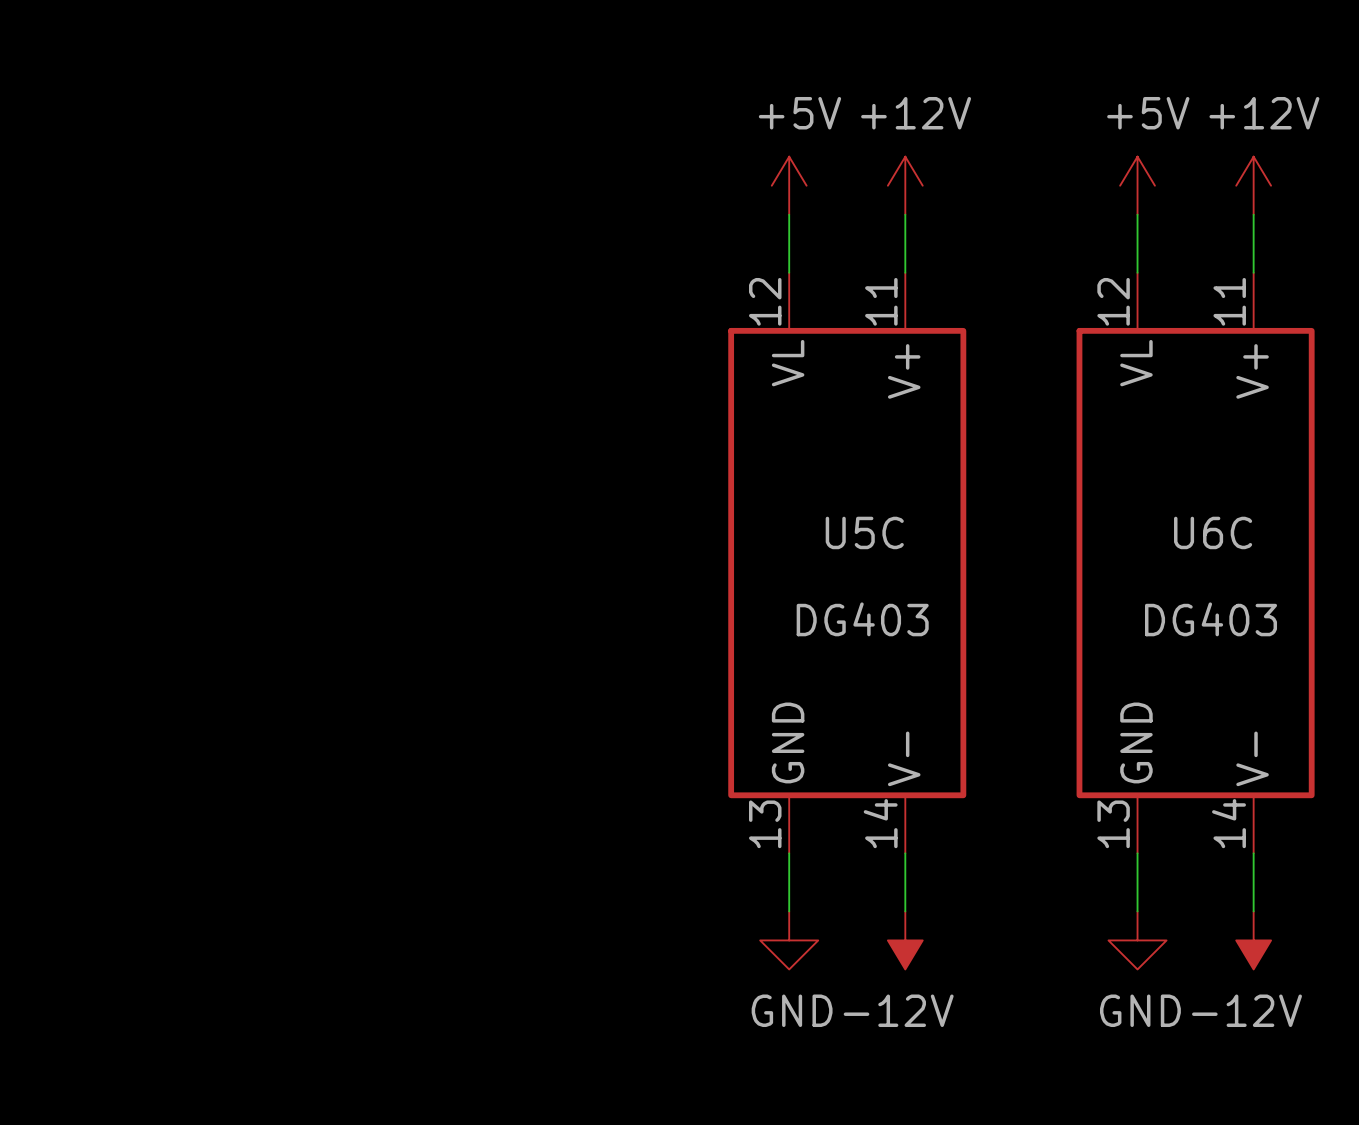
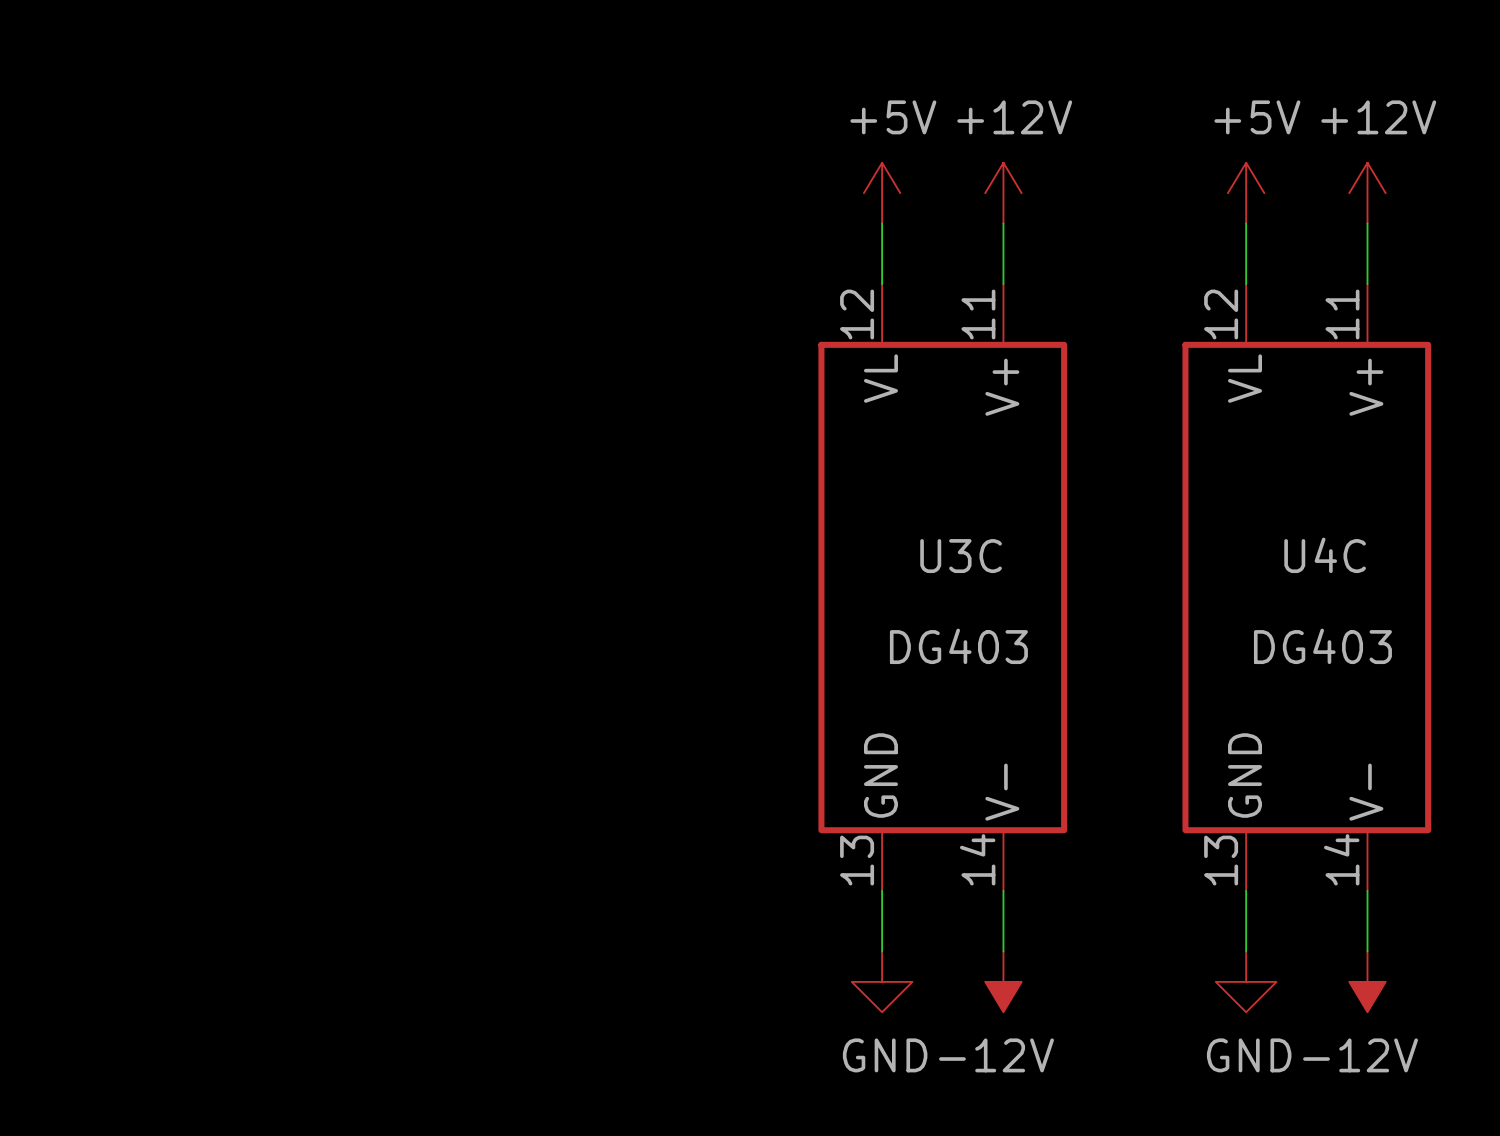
U5C name: U5C (864, 532) -> U3C (961, 556)
U6C name: U6C (1213, 532) -> U4C (1325, 555)

